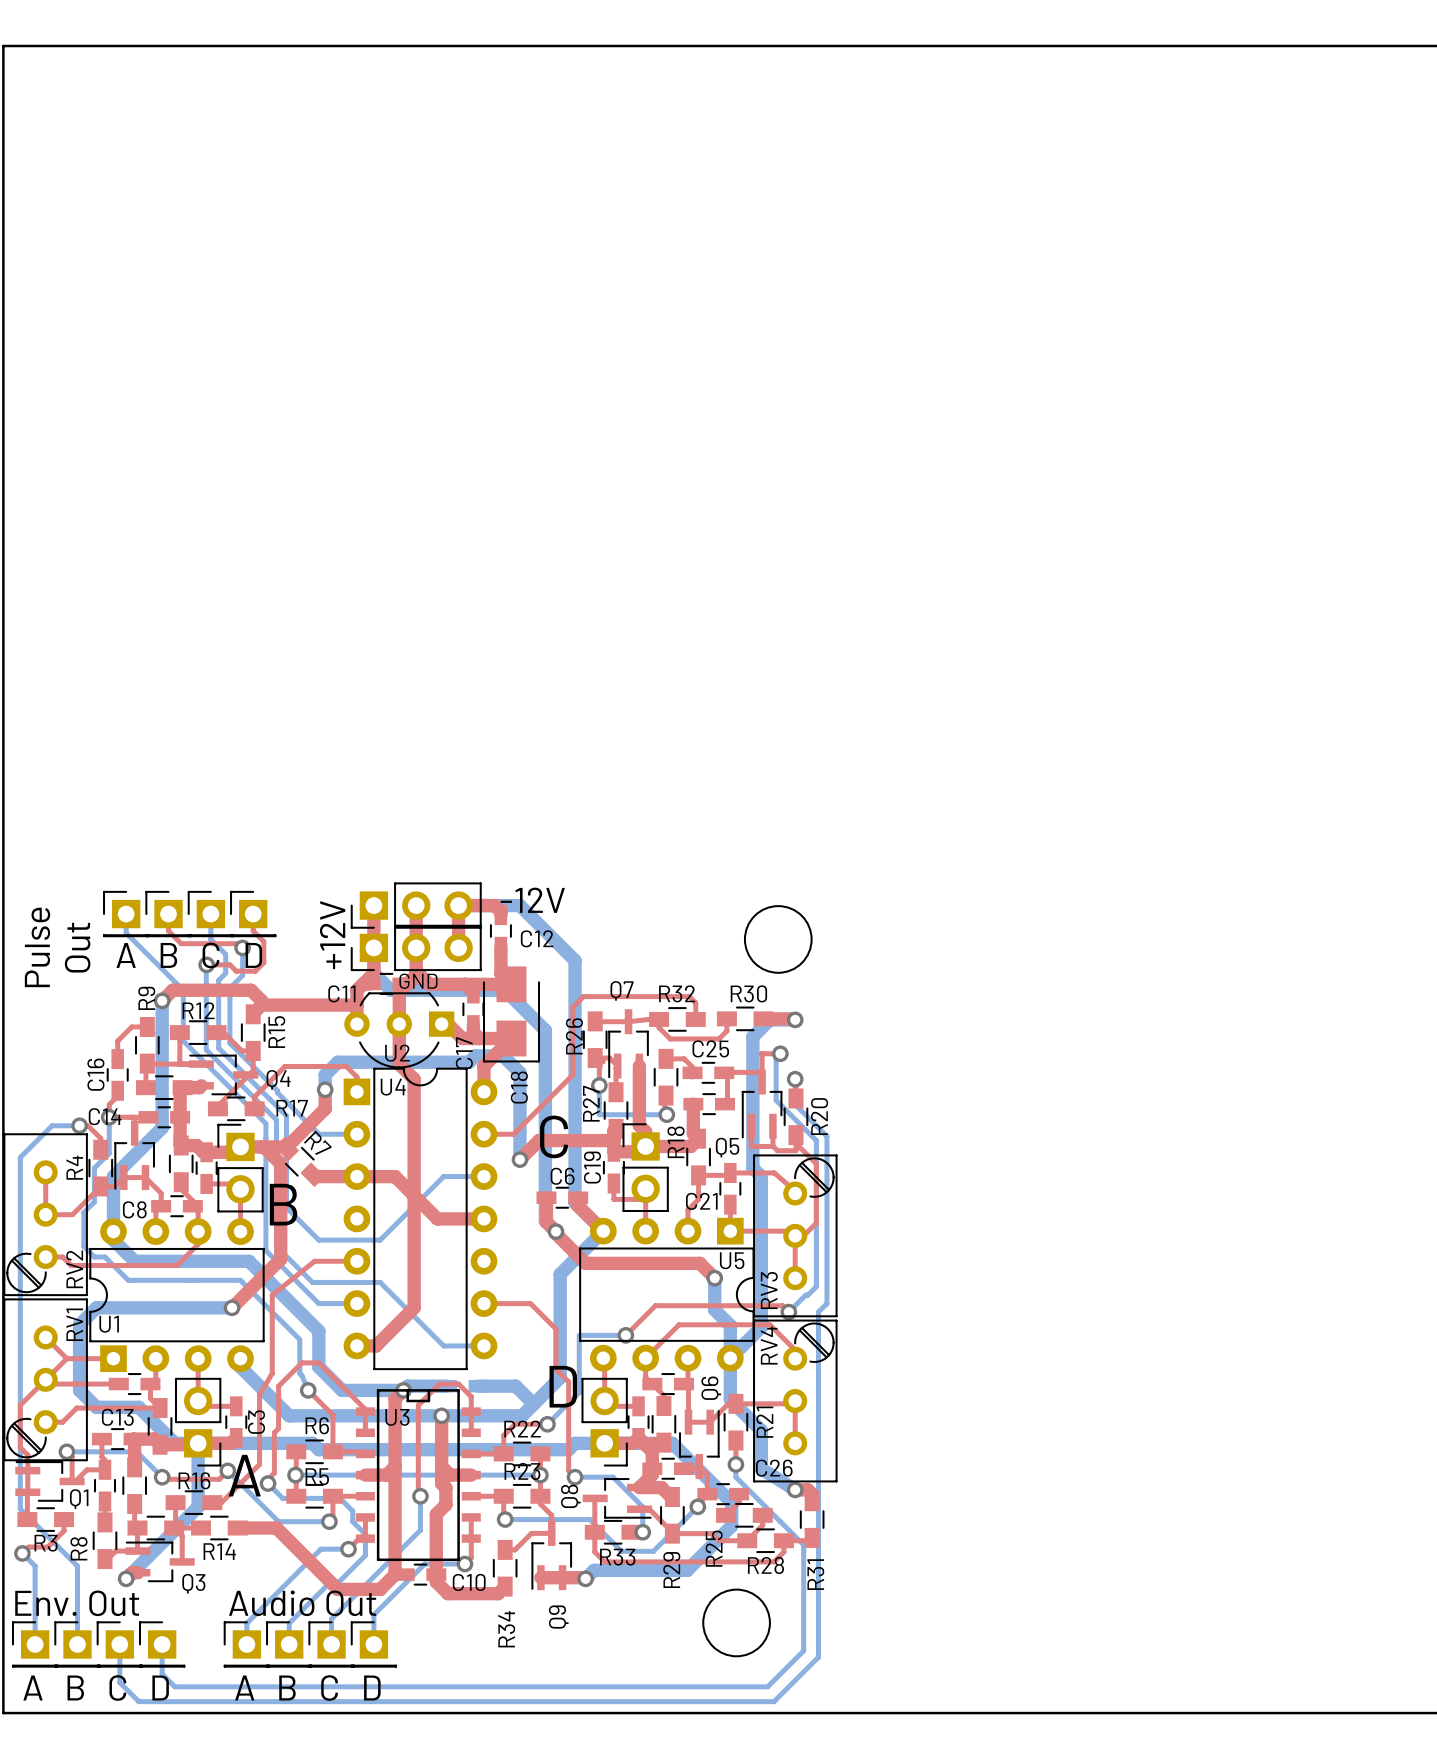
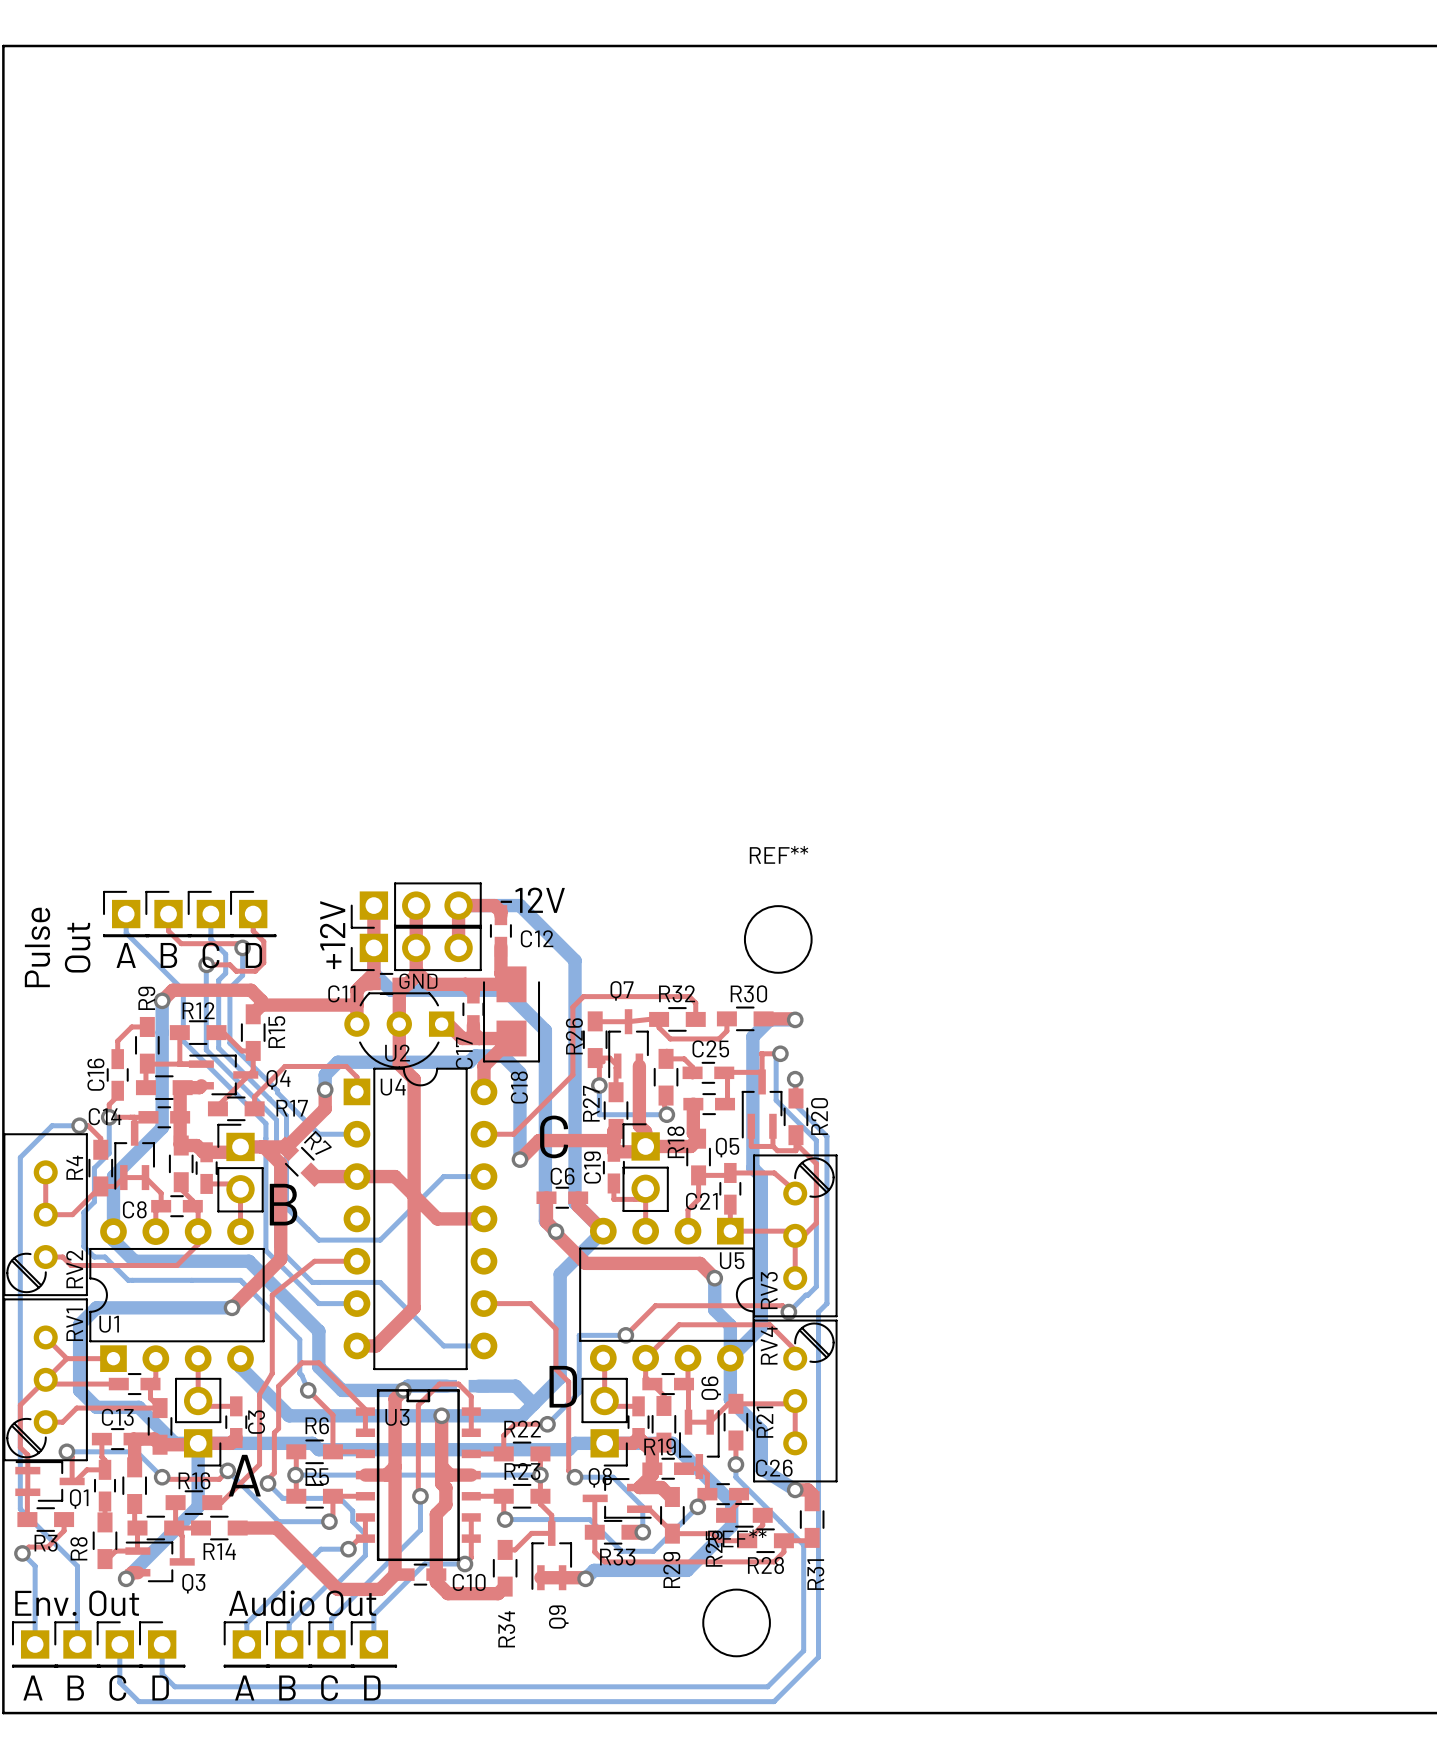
REF** name: none -> REF** (779, 854)
R19 name: none -> R19 (660, 1446)
Q8 name rotation: 0° (570, 1496) -> 90° clockwise (600, 1477)
REF** name: none -> REF** (737, 1538)

